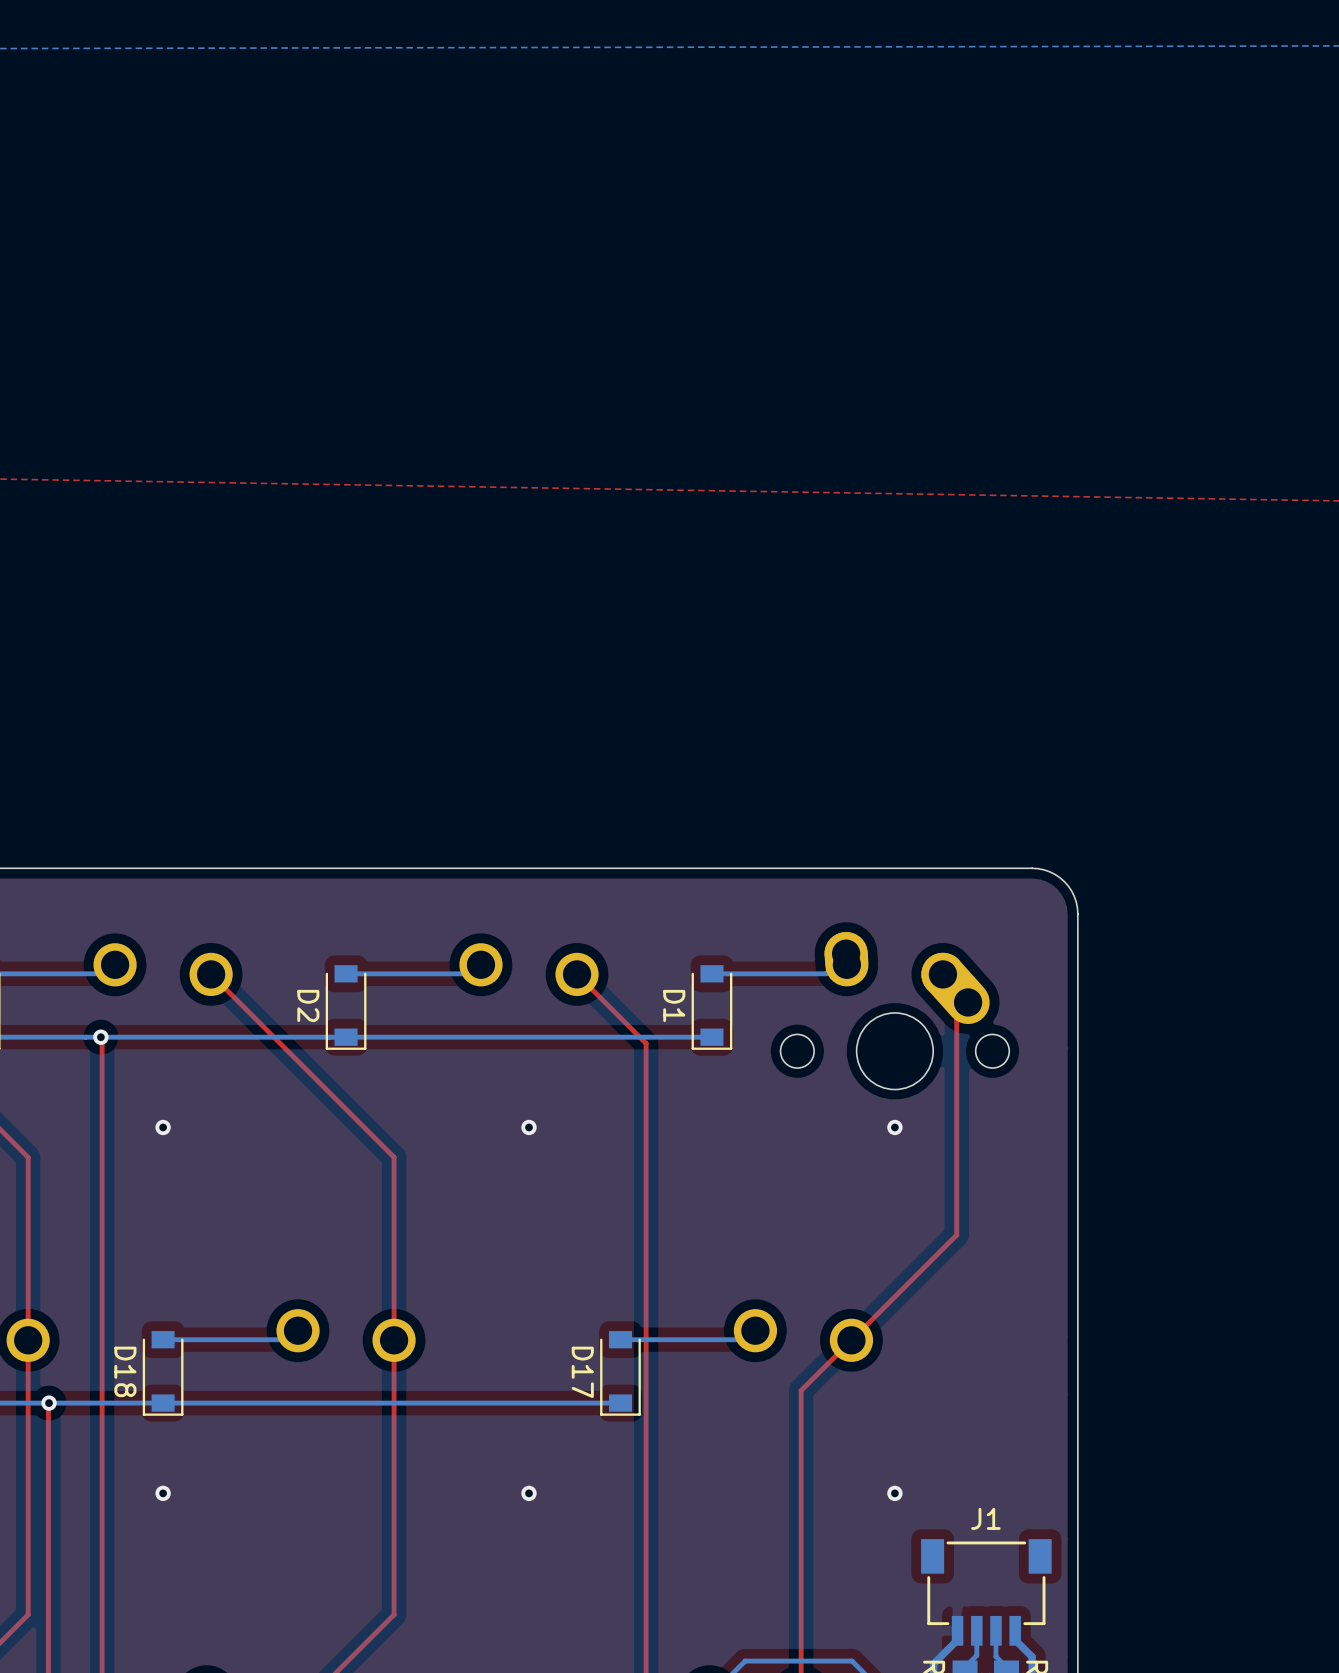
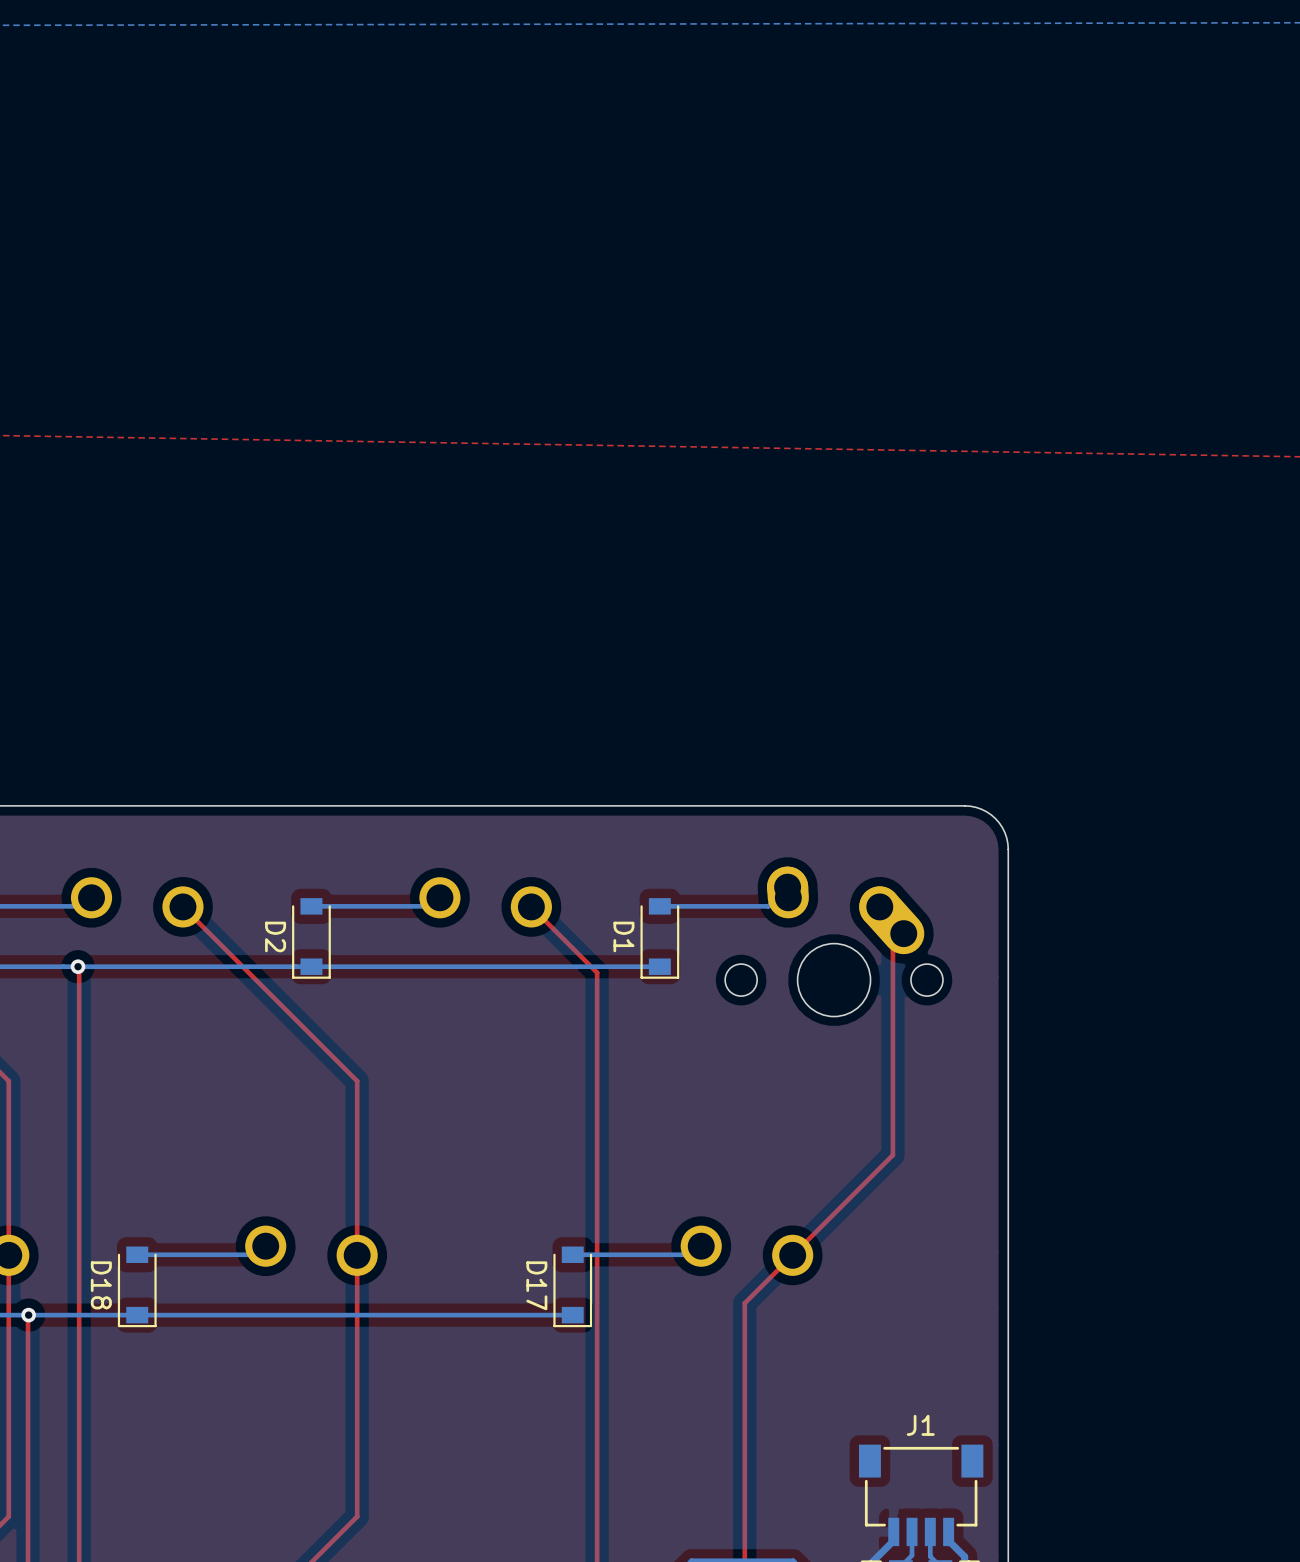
via: (163, 1127) -> none
via: (529, 1127) -> none
via: (894, 1127) -> none
via: (163, 1493) -> none
via: (529, 1493) -> none
via: (894, 1493) -> none

